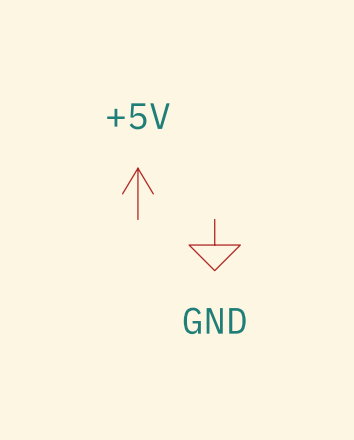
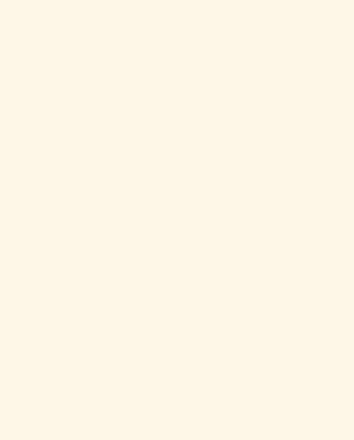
power symbol: +5V (137, 193) -> none
power symbol: GND (214, 245) -> none

